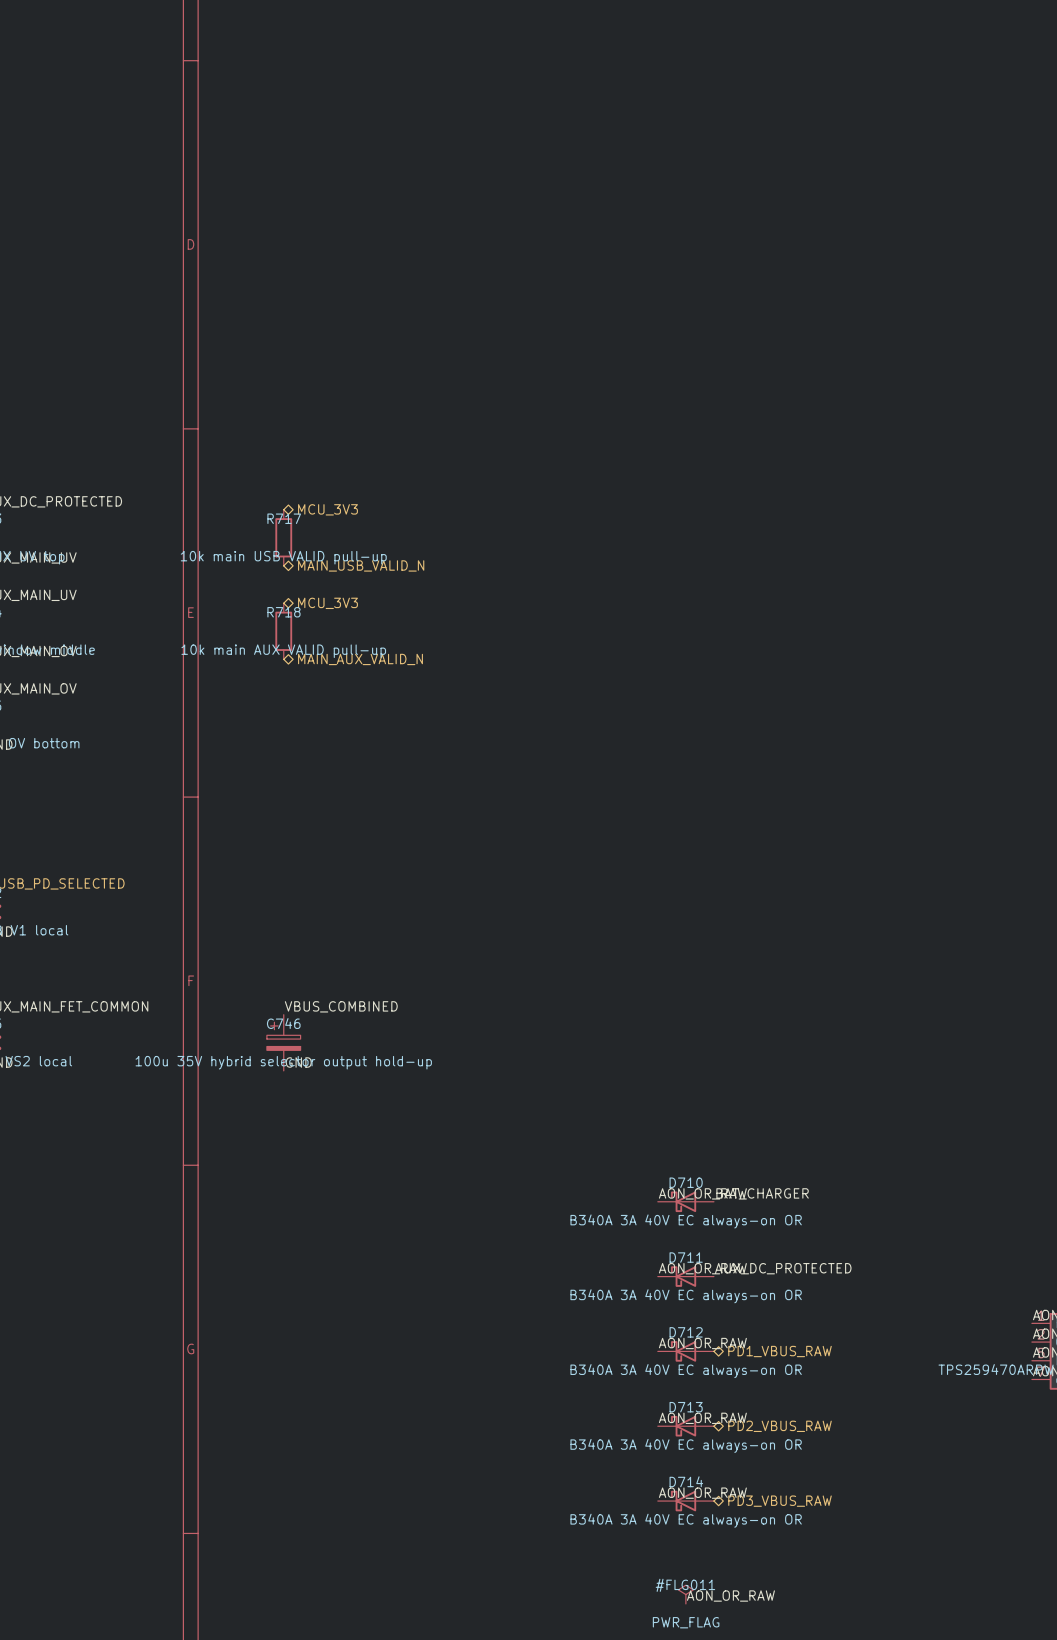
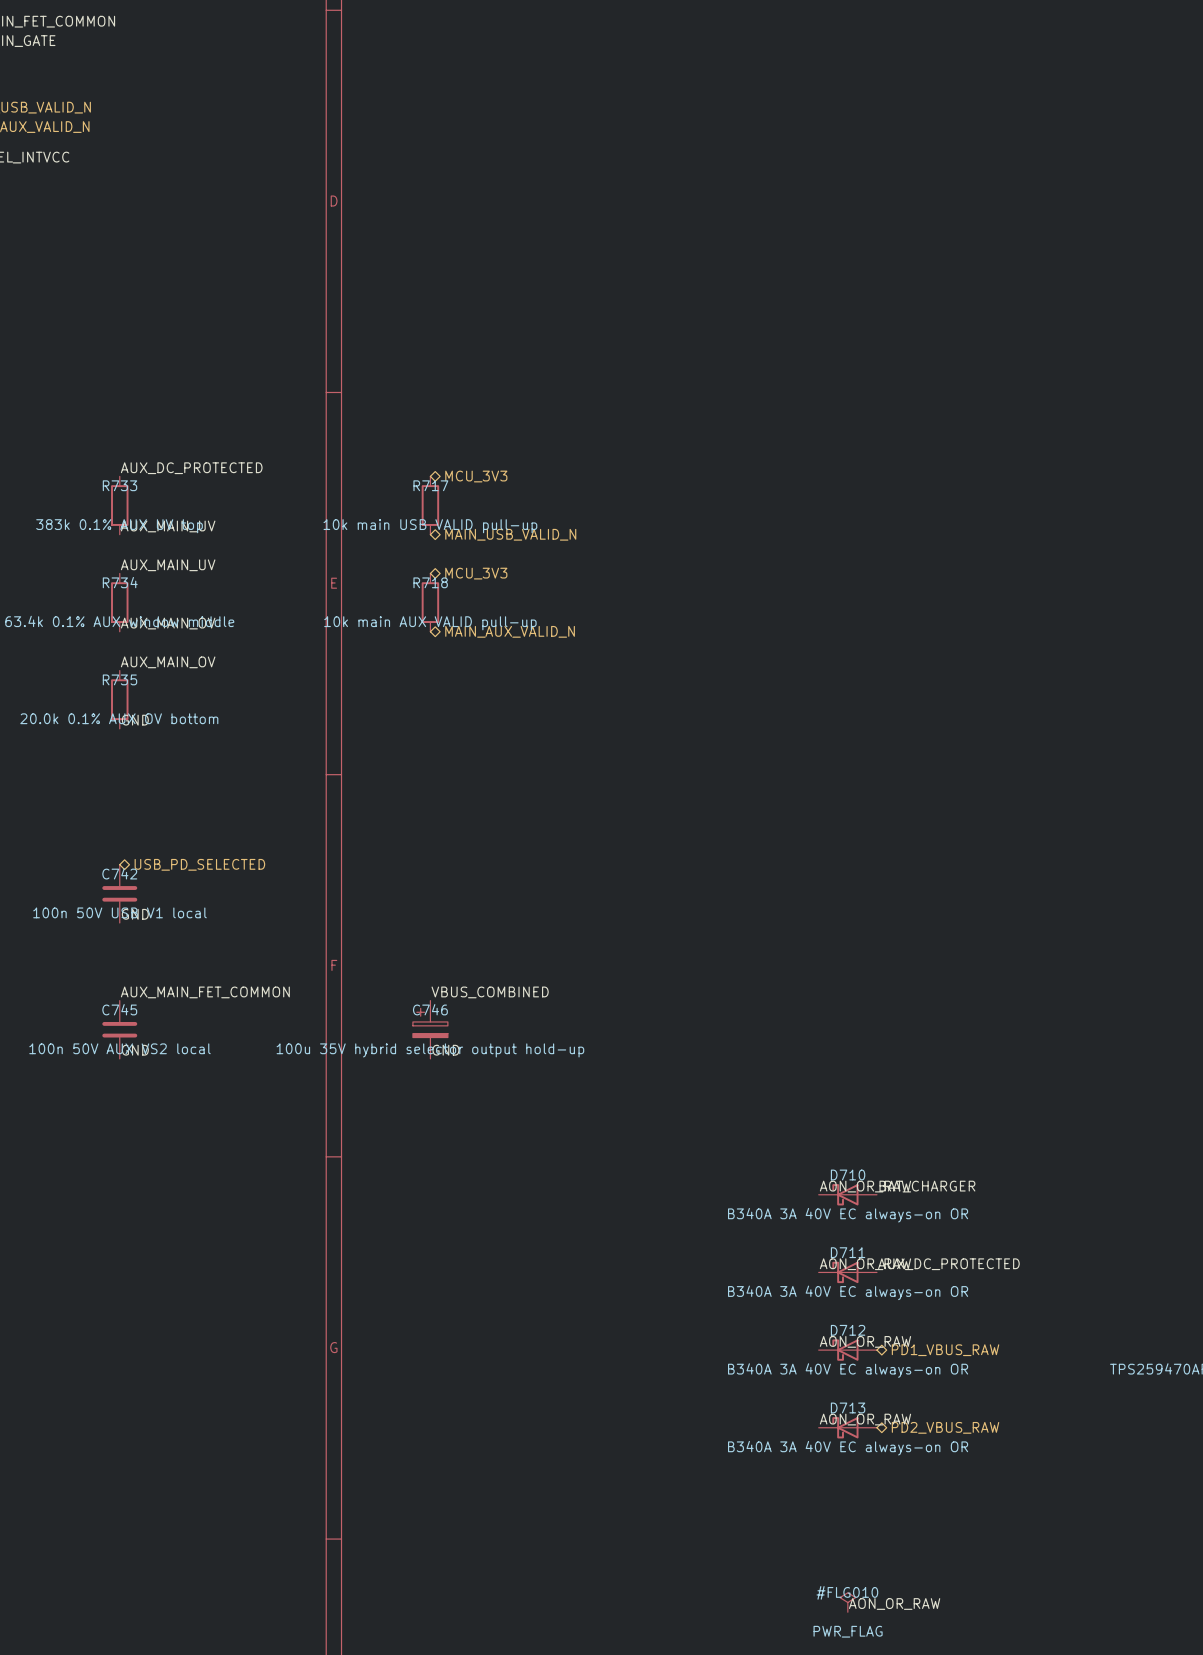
label: AON_OR_RAW (702, 1493) -> none
D714: B340A 3A 40V EC always-on OR (685, 1501) -> none
hierarchical label: PD3_VBUS_RAW (780, 1501) -> none
#FLG011 name: #FLG011 (685, 1585) -> #FLG010 (847, 1592)

